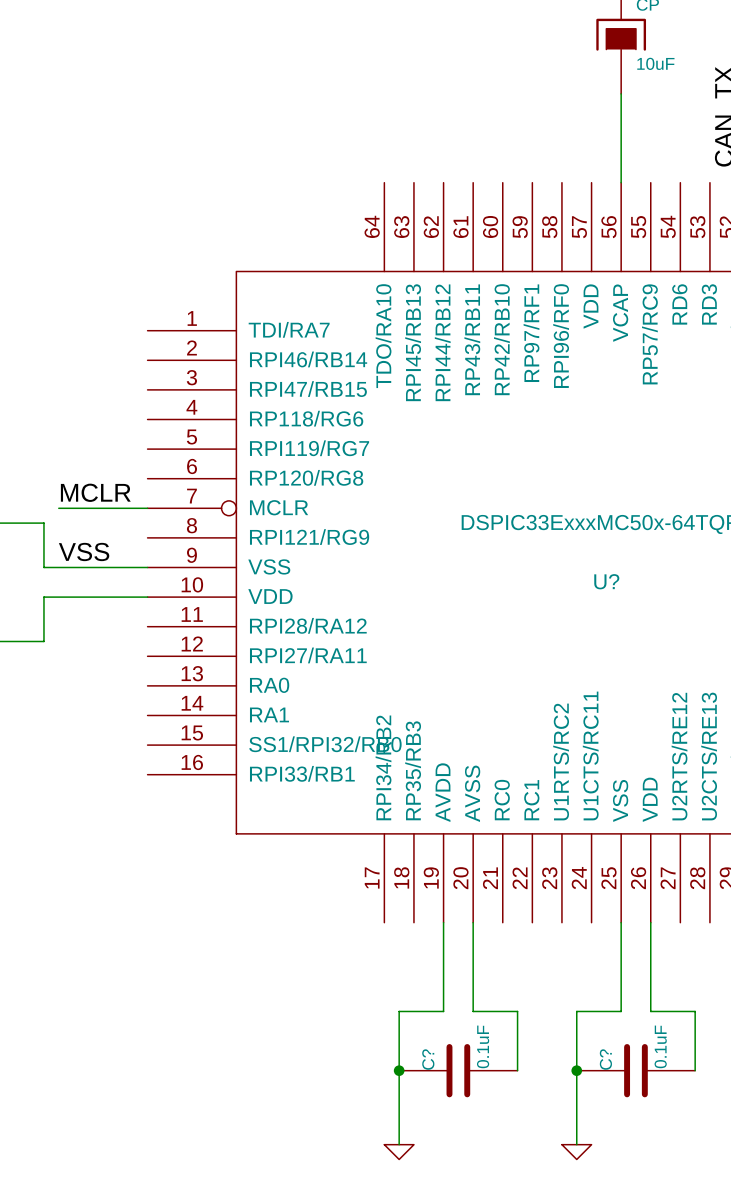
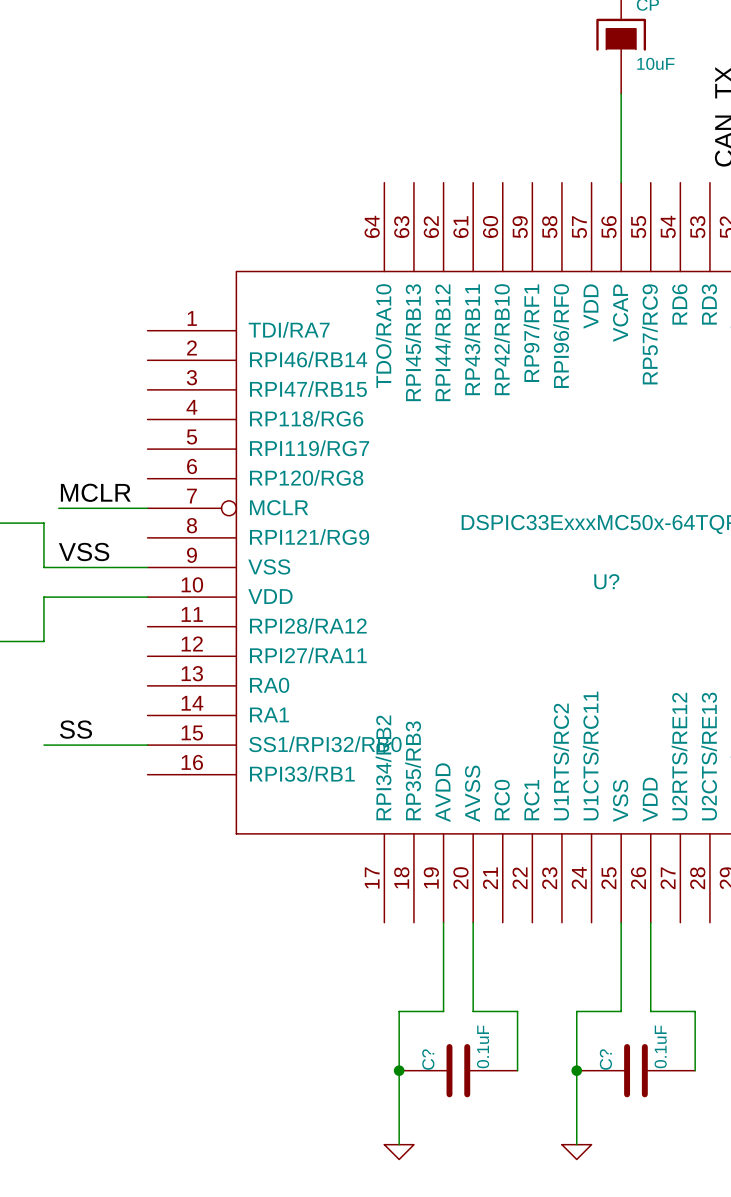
label: none -> SS (75, 729)
wire: none -> (43, 745) (147, 745)

